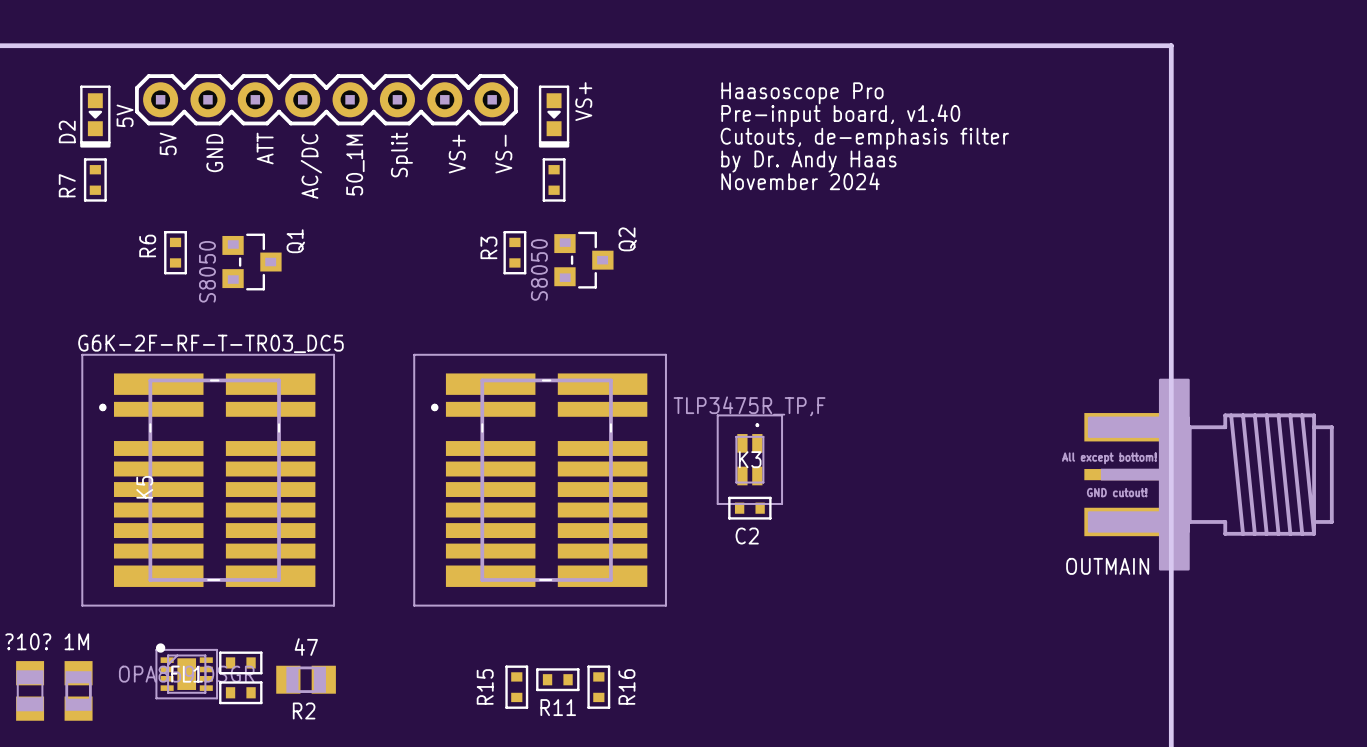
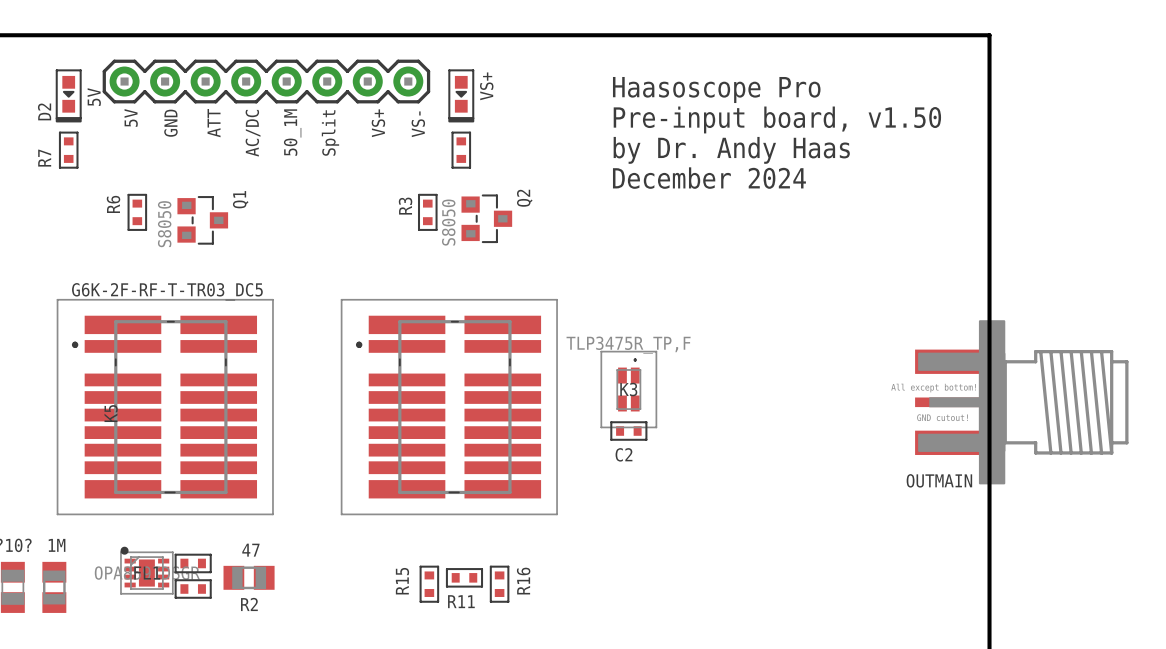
text: Haasoscope Pro (802, 93) -> none
text: Pre-input board, v1.40 (840, 115) -> Haasoscope Pro (716, 90)
text: Cutouts, de-emphasis filter (864, 138) -> none
text: none -> Pre-input board, v1.50 (777, 119)
text: by Dr. Andy Haas (808, 161) -> none
text: November 2024 (800, 181) -> by Dr. Andy Haas (731, 150)
text: none -> December 2024 (709, 178)

